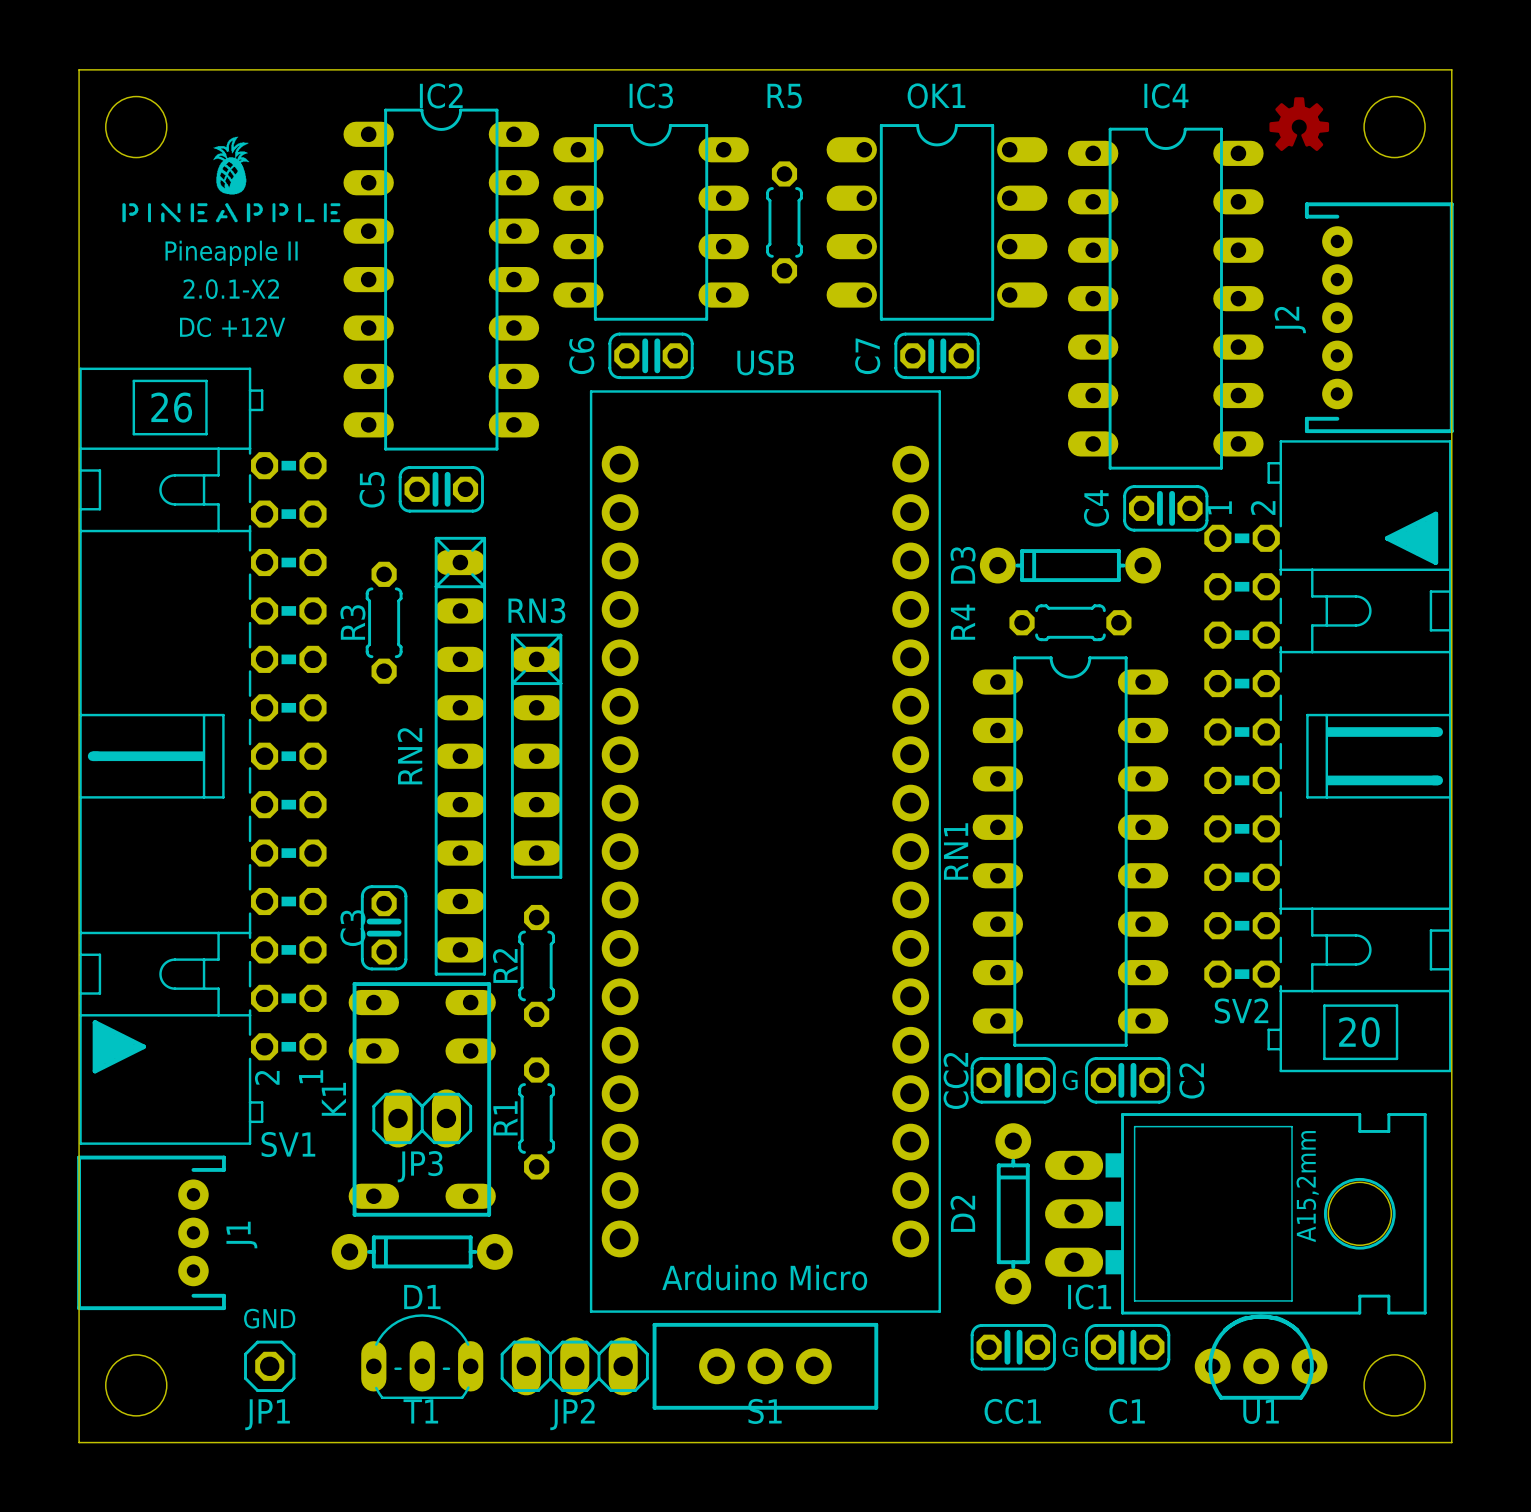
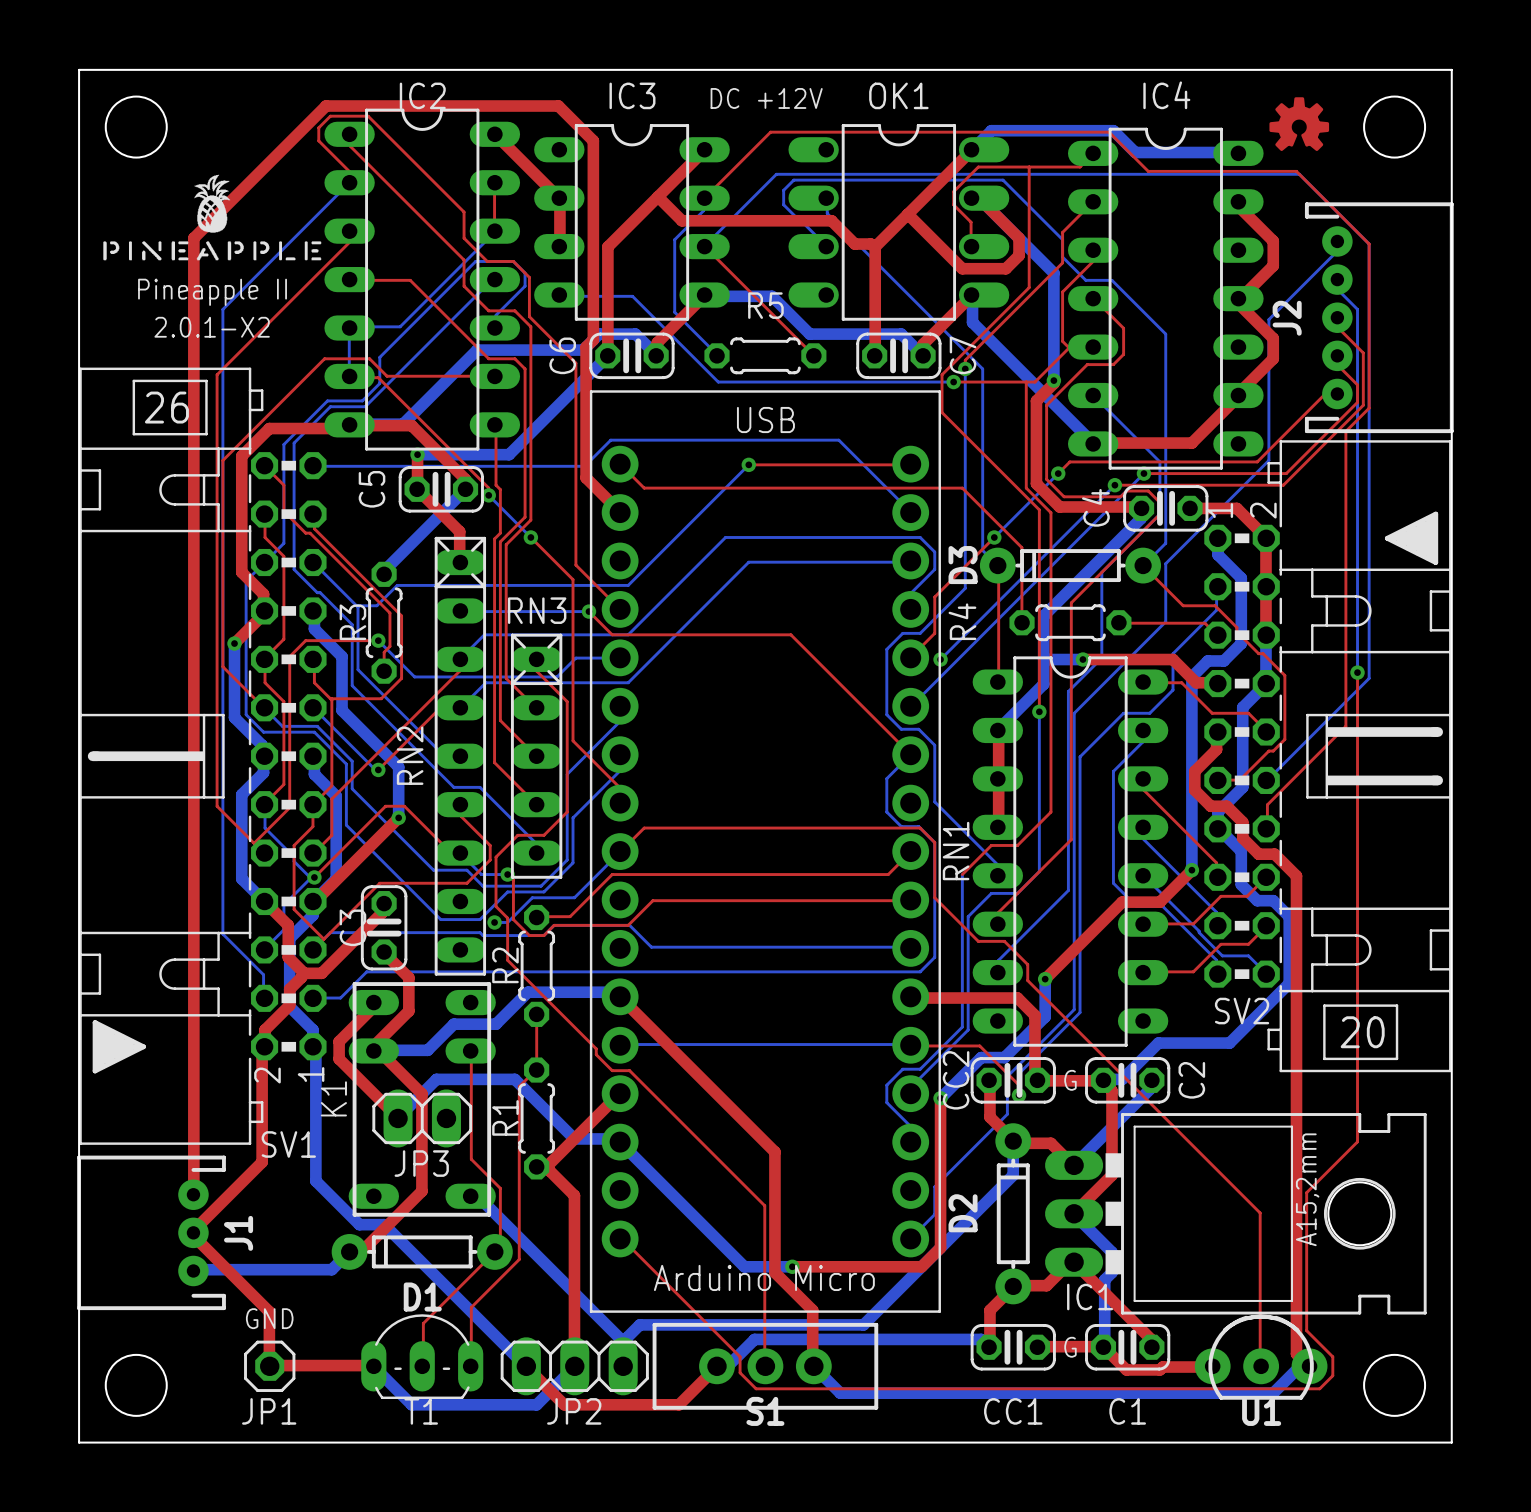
R5 name position: R5 (784, 96) -> R5 (765, 305)
text: none -> DC +12V (766, 98)
top track: none -> (349, 134) (350, 146) (464, 260) (464, 286) (488, 310) (514, 310) (530, 326) (530, 520) (506, 544) (506, 678) (536, 707)
top track: none -> (494, 134) (559, 198) (559, 246)
top track: none -> (704, 149) (607, 246) (607, 355)
top track: none -> (971, 149) (875, 246)
bottom track: none -> (971, 149) (991, 130) (1113, 130) (1135, 152) (1238, 153)
top track: none -> (1093, 153) (1080, 167) (978, 167) (953, 191) (953, 204) (971, 222) (971, 246)
top track: none -> (1029, 167) (1029, 287) (942, 374) (942, 412) (1039, 509) (1039, 711)
drawing position: (231, 179) -> (212, 217)
top track: none -> (349, 182) (349, 171) (318, 140) (318, 127) (330, 116) (368, 116) (464, 212) (464, 238) (487, 261) (513, 261) (529, 277) (529, 316) (575, 363) (575, 565) (620, 609)
bottom track: none -> (349, 182) (222, 309) (222, 934) (263, 974) (264, 998)
top track: none -> (494, 182) (494, 230)
top track: none -> (658, 196) (681, 220) (831, 220) (854, 244) (870, 244) (875, 246)
top track: none -> (704, 198) (770, 132) (1109, 132) (1148, 171) (1296, 171) (1369, 244) (1369, 408) (1345, 431) (1345, 726) (1267, 804) (1266, 828)
bottom track: none -> (704, 198) (703, 210) (674, 239) (674, 312) (716, 355)
bottom track: none -> (826, 198) (827, 213) (982, 368) (982, 550) (997, 565)
top track: none -> (971, 198) (979, 198) (1019, 238) (1019, 255) (1005, 268) (962, 268) (907, 214)
bottom track: none -> (971, 198) (979, 198) (1053, 273) (1053, 380)
top track: none -> (1093, 201) (1062, 232) (1062, 262) (965, 360) (965, 368)
top track: none -> (1238, 201) (1239, 207) (1273, 241) (1273, 265) (1238, 298) (1239, 305) (1273, 338) (1273, 358) (1191, 443) (1093, 443)
IC3 position: (651, 222) -> (631, 222)
R5 rotation: 0° (784, 222) -> 90° clockwise (765, 355)
R5 position: (784, 222) -> (765, 355)
OK1 position: (937, 222) -> (898, 222)
top track: none -> (349, 231) (349, 242) (217, 374) (217, 806) (264, 853)
bottom track: none -> (494, 231) (400, 326) (350, 326) (349, 376)
bottom track: none -> (1337, 241) (1337, 251) (1268, 319) (1268, 460) (1165, 563) (1165, 621) (1074, 713) (1074, 1009) (1007, 1076) (1007, 1114) (934, 1186) (934, 1214) (910, 1238)
top track: none -> (704, 246) (813, 355)
bottom track: none -> (704, 246) (776, 174) (1299, 174) (1369, 244) (1369, 678) (1266, 780)
bottom track: none -> (826, 246) (783, 204) (783, 190) (793, 180) (1003, 180) (1062, 239) (1062, 257) (1085, 280) (1111, 280) (1165, 334) (1165, 543) (1143, 565)
top track: none -> (875, 246) (874, 355)
top track: none -> (1093, 250) (1093, 261) (1062, 291) (1062, 341) (1068, 347) (1093, 347)
text position: Pineapple II (231, 253) -> Pineapple II (212, 292)
top track: none -> (349, 279) (410, 280) (488, 358) (514, 358) (525, 368) (525, 517) (500, 541) (500, 720) (536, 756)
IC2 position: (441, 279) -> (422, 279)
bottom track: none -> (494, 279) (491, 280) (365, 406) (330, 406) (294, 443) (294, 569) (352, 624) (352, 685) (453, 787) (480, 787) (535, 842) (536, 853)
bottom track: none -> (1337, 279) (1338, 290) (1357, 309) (1357, 672)
text position: 2.0.1-X2 (231, 289) -> 2.0.1-X2 (212, 327)
bottom track: none -> (559, 295) (632, 296) (718, 382) (953, 382)
top track: none -> (704, 295) (657, 342) (656, 355)
bottom track: none -> (704, 295) (772, 296) (809, 334) (901, 334) (923, 355)
top track: none -> (971, 295) (923, 344) (923, 355)
bottom track: none -> (971, 295) (972, 322) (1093, 443)
top track: none -> (1093, 298) (1123, 328) (1123, 354) (1113, 364) (1087, 364) (1046, 405) (1046, 479) (1064, 496) (1120, 496) (1126, 491) (1148, 491) (1159, 502) (1159, 514) (1071, 602) (1071, 839) (998, 912) (997, 924)
top track: none -> (1337, 317) (1338, 328) (1363, 352) (1363, 405) (1283, 485) (1114, 485)
text: DC +12V (232, 327) -> none
bottom track: none -> (494, 328) (496, 315) (525, 286) (525, 273) (513, 261) (475, 261) (379, 357) (379, 383) (362, 400) (327, 400) (283, 444) (283, 543) (246, 581) (246, 714) (263, 732) (314, 732) (346, 764) (346, 825) (440, 919) (480, 919) (507, 891) (543, 891) (573, 862) (573, 817) (619, 771) (620, 754)
top track: none -> (1093, 347) (1069, 347) (1035, 382) (953, 382)
bottom track: none -> (607, 355) (509, 454) (417, 454)
C6 position: (651, 355) -> (631, 355)
bottom track: none -> (656, 355) (635, 334) (599, 334) (583, 350) (477, 350) (403, 424) (349, 424)
C7 position: (937, 355) -> (898, 355)
top track: none -> (1337, 355) (1338, 366) (1357, 384) (1357, 402) (1286, 473) (1143, 473)
C7 name position: C7 (867, 356) -> C7 (963, 355)
text position: USB (765, 362) -> USB (765, 420)
bottom track: none -> (965, 368) (965, 588) (920, 633) (902, 633) (886, 649) (886, 714) (901, 729) (918, 729) (934, 745) (934, 801) (997, 864) (997, 875)
via: none -> (965, 368)
top track: none -> (349, 376) (378, 377) (488, 488) (488, 495)
top track: none -> (494, 376) (387, 376) (369, 358) (324, 358) (222, 460) (222, 666) (264, 707)
top track: none -> (1053, 380) (1053, 383) (1036, 400) (1036, 483) (1059, 506) (1141, 508)
via: none -> (1053, 380)
via: none -> (953, 382)
top track: none -> (1026, 382) (1026, 488) (1050, 512) (1050, 812) (1017, 845) (991, 845) (962, 874)
top track: none -> (1337, 393) (1324, 395) (1257, 461) (1069, 461) (1058, 473)
bottom track: none -> (1093, 395) (1159, 461) (1159, 514) (1101, 572) (1101, 658) (1068, 691) (1068, 890) (998, 960) (997, 972)
top track: none -> (494, 424) (496, 485) (500, 489) (500, 533) (494, 538) (494, 762) (536, 804)
top track: none -> (417, 454) (417, 489) (459, 531) (460, 562)
via: none -> (417, 454)
top track: none -> (620, 464) (644, 488) (962, 488) (1021, 547) (1022, 622)
bottom track: none -> (748, 464) (628, 585) (397, 585) (376, 605) (357, 606)
via: none -> (748, 464)
top track: none -> (910, 464) (748, 464)
top track: none -> (264, 465) (283, 485) (283, 511) (305, 533) (310, 533) (389, 613) (389, 646) (384, 652) (384, 671)
bottom track: none -> (313, 465) (584, 466) (610, 440) (838, 440) (910, 512)
bottom track: none -> (1058, 473) (994, 537)
via: none -> (1058, 473)
bottom track: none -> (1143, 473) (910, 706)
via: none -> (1143, 473)
bottom track: none -> (1114, 485) (940, 659)
via: none -> (1114, 485)
top track: none -> (465, 489) (465, 479) (411, 425) (349, 424) (344, 428) (269, 428) (241, 456) (241, 572) (263, 594) (264, 610) (262, 615) (234, 643)
bottom track: none -> (465, 489) (384, 570) (384, 574)
bottom track: none -> (488, 495) (530, 537)
via: none -> (488, 495)
bottom track: none -> (1141, 508) (1141, 518) (1043, 615) (1043, 684) (997, 730)
top track: none -> (1190, 508) (1236, 508) (1265, 537) (1266, 635)
top track: none -> (620, 512) (586, 477) (586, 347) (593, 339) (593, 140) (558, 106) (326, 106) (193, 238) (193, 1194)
top track: none -> (264, 514) (265, 537) (283, 556) (283, 639) (264, 659) (265, 682) (283, 701) (283, 784) (264, 804)
top track: none -> (313, 514) (314, 528) (401, 615) (401, 678) (381, 698) (331, 699)
top track: none -> (530, 537) (573, 579) (573, 740) (619, 787) (620, 803)
via: none -> (530, 537)
top track: none -> (994, 537) (934, 597) (934, 633) (910, 657)
via: none -> (994, 537)
bottom track: none -> (1217, 538) (1218, 554) (1241, 578) (1241, 643) (1223, 660) (1207, 660) (1191, 676) (1191, 870)
bottom track: none -> (910, 560) (748, 562) (628, 682) (485, 682) (460, 707)
bottom track: none -> (313, 562) (358, 607) (358, 669) (443, 755) (460, 756)
top track: none -> (997, 565) (997, 682)
top track: none -> (1143, 565) (1183, 605) (1215, 605) (1236, 627) (1236, 631) (1284, 675) (1284, 739) (1273, 751) (1268, 751) (1239, 780) (1217, 780)
bottom track: none -> (1217, 586) (1216, 610) (1173, 653) (1173, 690) (1149, 713) (1123, 713) (1080, 756) (1080, 1012) (1019, 1073) (1019, 1095)
bottom track: none -> (910, 609) (911, 592) (934, 569) (934, 552) (920, 537) (725, 537) (628, 634) (484, 634) (460, 659)
bottom track: none -> (313, 610) (314, 629) (342, 656) (342, 710) (398, 767) (398, 817)
bottom track: none -> (460, 610) (588, 611)
top track: none -> (588, 611) (612, 634) (790, 634) (910, 754)
via: none -> (588, 611)
top track: none -> (1118, 622) (1204, 623) (1217, 635)
bottom track: none -> (1266, 635) (1266, 683) (1242, 707) (1242, 787) (1218, 812) (1217, 828) (1241, 851) (1241, 884) (1257, 900) (1273, 900) (1289, 916) (1289, 983) (1229, 1043) (1158, 1043) (1122, 1079) (1103, 1080)
top track: none -> (378, 640) (305, 640) (289, 656) (289, 807) (254, 843)
bottom track: none -> (378, 640) (414, 676) (557, 676) (575, 658) (620, 657)
via: none -> (378, 640)
bottom track: none -> (234, 643) (234, 717) (262, 745) (264, 756) (263, 772) (241, 794) (241, 878) (264, 901)
via: none -> (234, 643)
top track: none -> (313, 659) (314, 682) (331, 700) (331, 785) (313, 804)
top track: none -> (460, 659) (459, 671) (331, 798) (331, 835) (313, 853)
top track: none -> (536, 659) (536, 671) (567, 701) (567, 812) (543, 835) (517, 835) (496, 857) (496, 906) (507, 918) (507, 960) (596, 1048) (596, 1054) (612, 1070) (629, 1070) (764, 1205) (765, 1366)
via: none -> (940, 659)
bottom track: none -> (1043, 659) (1082, 659)
top track: none -> (1082, 659) (1173, 659) (1196, 682) (1217, 683)
via: none -> (1082, 659)
top track: none -> (1357, 672) (1357, 1141) (1306, 1192) (1306, 1330) (1332, 1356) (1332, 1375) (1319, 1388) (756, 1388) (740, 1372) (740, 1356) (620, 1238)
via: none -> (1357, 672)
top track: none -> (1143, 682) (1181, 682) (1212, 713) (1248, 713) (1266, 732)
bottom track: none -> (620, 706) (619, 721) (567, 774) (567, 860) (541, 886) (482, 886) (466, 870) (433, 870) (352, 788) (352, 761) (317, 726) (282, 726) (264, 707)
bottom track: none -> (313, 707) (375, 769) (378, 769)
top track: none -> (460, 707) (439, 708) (378, 769)
bottom track: none -> (1039, 711) (1039, 871) (1017, 893) (991, 893) (968, 916) (968, 1029) (911, 1086) (910, 1093)
via: none -> (1039, 711)
top track: none -> (997, 730) (997, 827)
bottom track: none -> (1143, 730) (1142, 742) (1113, 771) (1113, 883) (1136, 906) (1162, 906) (1216, 960) (1217, 974)
top track: none -> (1217, 732) (1216, 749) (1194, 771) (1194, 790) (1210, 806) (1226, 806) (1242, 822) (1242, 838) (1258, 854) (1274, 854) (1296, 875) (1296, 1353) (1309, 1366)
bottom track: none -> (910, 754) (886, 778) (886, 812) (901, 826) (918, 826) (934, 842) (934, 957) (920, 971) (366, 971) (340, 998) (313, 998)
bottom track: none -> (313, 756) (314, 774) (336, 796) (336, 878) (313, 901) (312, 915) (289, 938) (289, 1006) (312, 1029) (313, 1046) (315, 1051) (315, 1181) (359, 1224) (384, 1224) (526, 1366)
via: none -> (378, 769)
top track: none -> (1143, 778) (1143, 790) (1216, 862) (1217, 877)
bottom track: none -> (264, 804) (265, 828) (294, 857) (294, 861) (310, 877) (314, 877)
top track: none -> (312, 804) (312, 826) (294, 845) (294, 909) (323, 939)
top track: none -> (460, 804) (461, 816) (490, 845) (490, 860) (466, 883) (379, 883) (313, 949)
top track: none -> (398, 817) (313, 901)
via: none -> (398, 817)
bottom track: none -> (1143, 827) (1143, 839) (1216, 912) (1217, 925)
top track: none -> (620, 851) (644, 828) (920, 828) (934, 842) (934, 897) (978, 941) (1004, 941) (1027, 964) (1027, 980) (1260, 1213) (1261, 1366)
bottom track: none -> (620, 851) (574, 897) (532, 897) (507, 922) (494, 922)
top track: none -> (910, 851) (888, 874) (612, 874) (570, 916) (536, 917)
top track: none -> (460, 853) (450, 852) (404, 806) (385, 806) (314, 877)
bottom track: none -> (460, 853) (481, 874) (507, 874)
top track: none -> (1191, 870) (1159, 902) (1122, 902) (1045, 979)
via: none -> (1191, 870)
top track: none -> (507, 874) (513, 880) (513, 919) (529, 935) (543, 935) (554, 925) (628, 925) (652, 900) (910, 899)
via: none -> (507, 874)
bottom track: none -> (962, 874) (962, 1027) (920, 1069) (902, 1069) (886, 1085) (886, 1102) (910, 1125) (910, 1142)
bottom track: none -> (1143, 875) (1222, 955) (1248, 955) (1266, 974)
bottom track: none -> (311, 877) (283, 905) (283, 929) (264, 949)
via: none -> (314, 877)
top track: none -> (1265, 877) (1247, 896) (1220, 896) (1193, 923) (1143, 924)
top track: none -> (264, 901) (288, 925) (288, 957) (304, 973)
top track: none -> (384, 903) (382, 912) (321, 973) (304, 973)
via: none -> (494, 922)
top track: none -> (1266, 925) (1248, 944) (1220, 944) (1193, 971) (1143, 972)
bottom track: none -> (910, 948) (651, 947) (629, 925) (554, 925) (543, 935) (482, 935) (480, 932) (330, 932) (313, 949)
top track: none -> (384, 952) (408, 977) (408, 1011) (373, 1045) (373, 1050) (378, 1054) (382, 1054) (421, 1093) (421, 1191) (362, 1250) (349, 1251)
top track: none -> (304, 973) (289, 989) (289, 1005) (265, 1029) (265, 1045) (262, 1051) (262, 1162) (196, 1227) (193, 1236) (269, 1311) (269, 1366) (373, 1366)
bottom track: none -> (1045, 979) (1045, 1016) (1004, 1057) (981, 1057) (940, 1098)
via: none -> (1045, 979)
top track: none -> (620, 996) (774, 1152) (774, 1272) (812, 1310) (813, 1366)
bottom track: none -> (620, 996) (615, 992) (527, 992) (496, 1024) (453, 1024) (427, 1050) (373, 1050)
top track: none -> (910, 996) (1017, 998) (1035, 1015) (1035, 1075) (1037, 1080) (1103, 1080) (1111, 1091) (1111, 1175) (1074, 1213)
top track: none -> (373, 1002) (372, 1008) (339, 1041) (339, 1059) (398, 1118)
top track: none -> (536, 1014) (536, 1070) (519, 1086) (519, 1259) (471, 1307) (470, 1366)
bottom track: none -> (620, 1045) (910, 1045)
top track: none -> (910, 1045) (979, 1045) (1019, 1085) (1019, 1095)
top track: none -> (470, 1050) (471, 1159) (500, 1188) (500, 1246) (423, 1323) (422, 1366)
top track: none -> (989, 1080) (989, 1117) (1013, 1141) (1019, 1143) (1050, 1143) (1074, 1165)
bottom track: none -> (1151, 1080) (1151, 1088) (1074, 1165)
top track: none -> (620, 1093) (546, 1166)
via: none -> (1019, 1095)
top track: none -> (940, 1098) (940, 1247) (921, 1266) (792, 1266)
via: none -> (940, 1098)
bottom track: none -> (398, 1118) (436, 1079) (514, 1079) (574, 1138) (615, 1138) (620, 1142) (744, 1266) (792, 1266)
bottom track: none -> (1013, 1141) (1013, 1175) (863, 1324) (639, 1324) (626, 1337) (623, 1366) (622, 1340) (480, 1198) (470, 1196)
top track: none -> (546, 1166) (574, 1195) (574, 1366)
bottom track: none -> (1074, 1213) (1111, 1252) (1111, 1272) (1104, 1279) (1103, 1347)
bottom track: none -> (349, 1251) (331, 1269) (193, 1270)
top track: none -> (1074, 1262) (1068, 1263) (1046, 1285) (1013, 1286) (989, 1310) (989, 1347)
top track: none -> (1074, 1262) (1151, 1339) (1151, 1347)
via: none -> (792, 1266)
bottom track: none -> (989, 1347) (981, 1339) (754, 1339) (728, 1365) (716, 1366)
top track: none -> (1037, 1347) (1103, 1346) (1126, 1369) (1212, 1366)
bottom track: none -> (373, 1366) (411, 1404) (536, 1404) (574, 1366)
top track: none -> (526, 1366) (564, 1404) (679, 1404) (716, 1366)
bottom track: none -> (813, 1366) (840, 1393) (1273, 1393) (1299, 1367) (1309, 1366)

